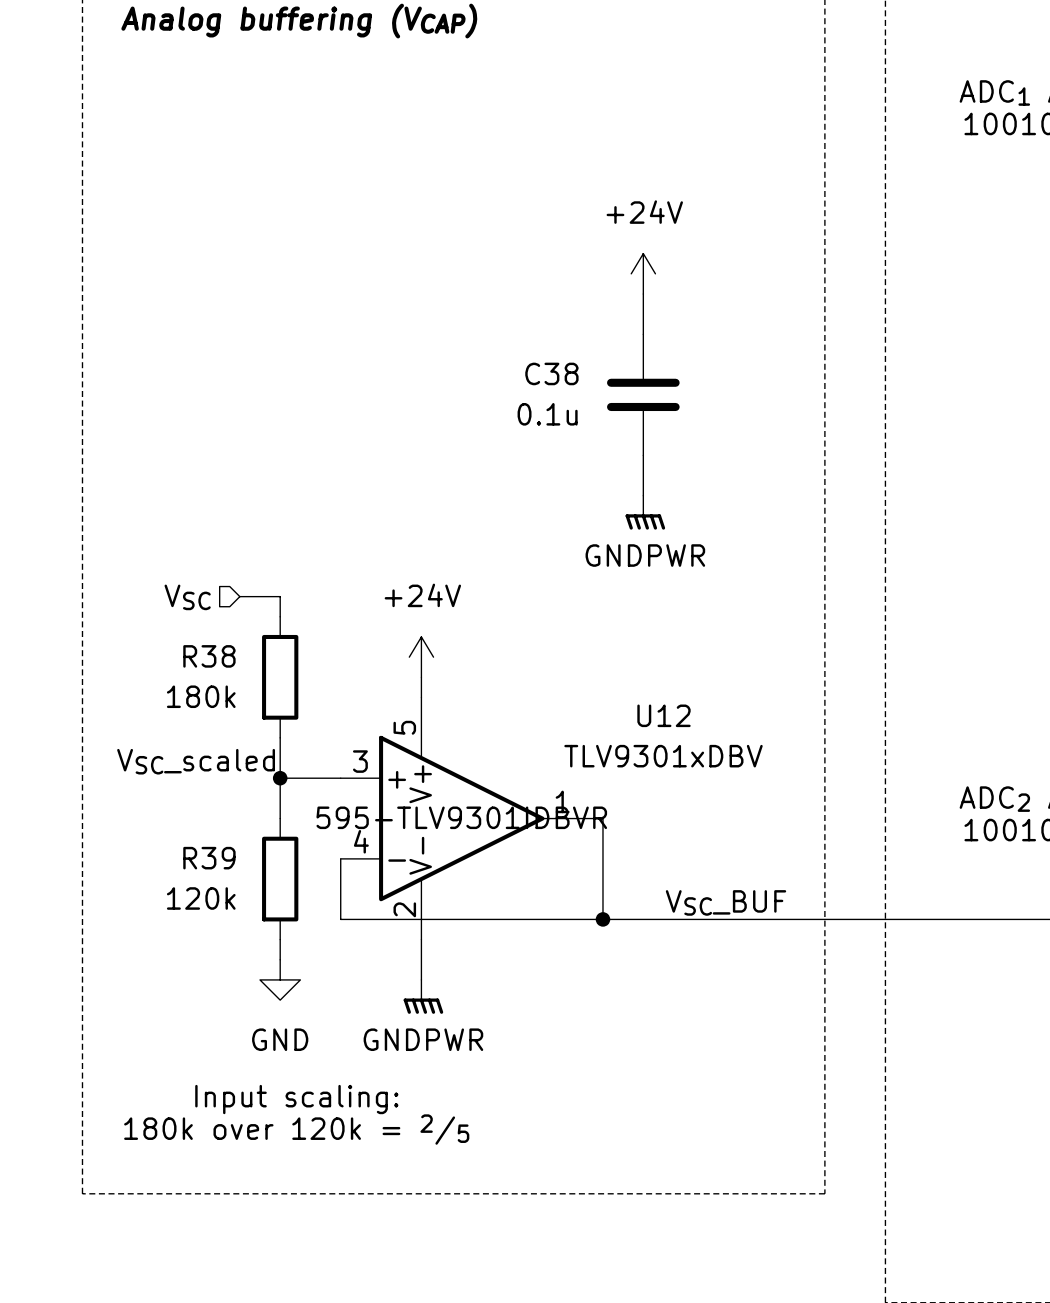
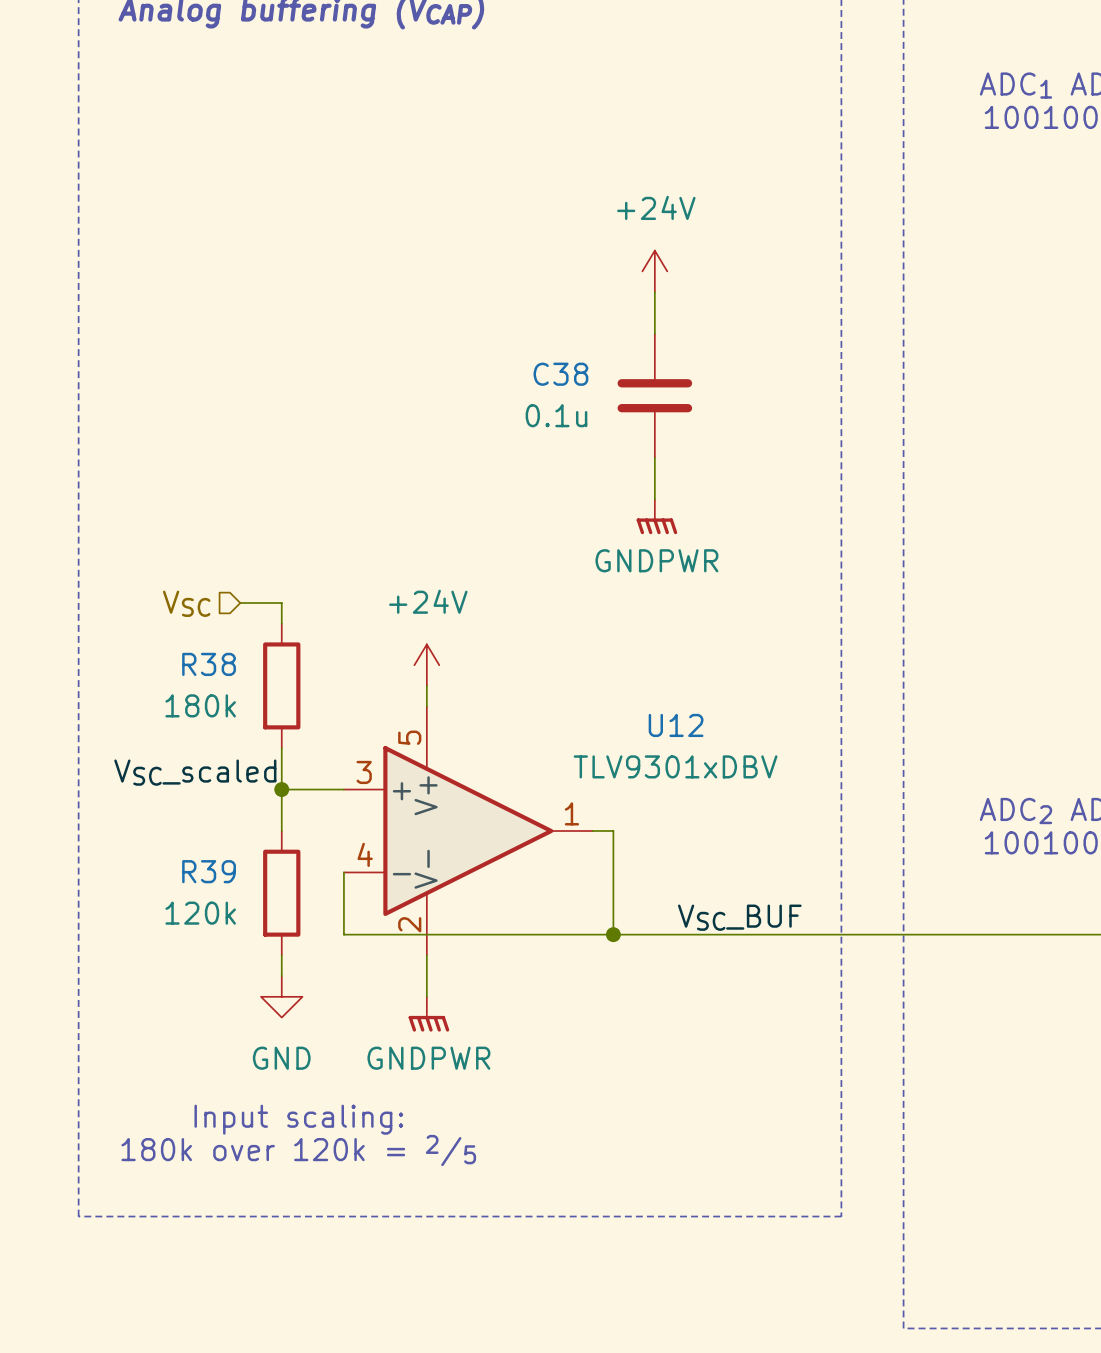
U12 text: 595-TLV9301IDBVR (461, 817) -> none

